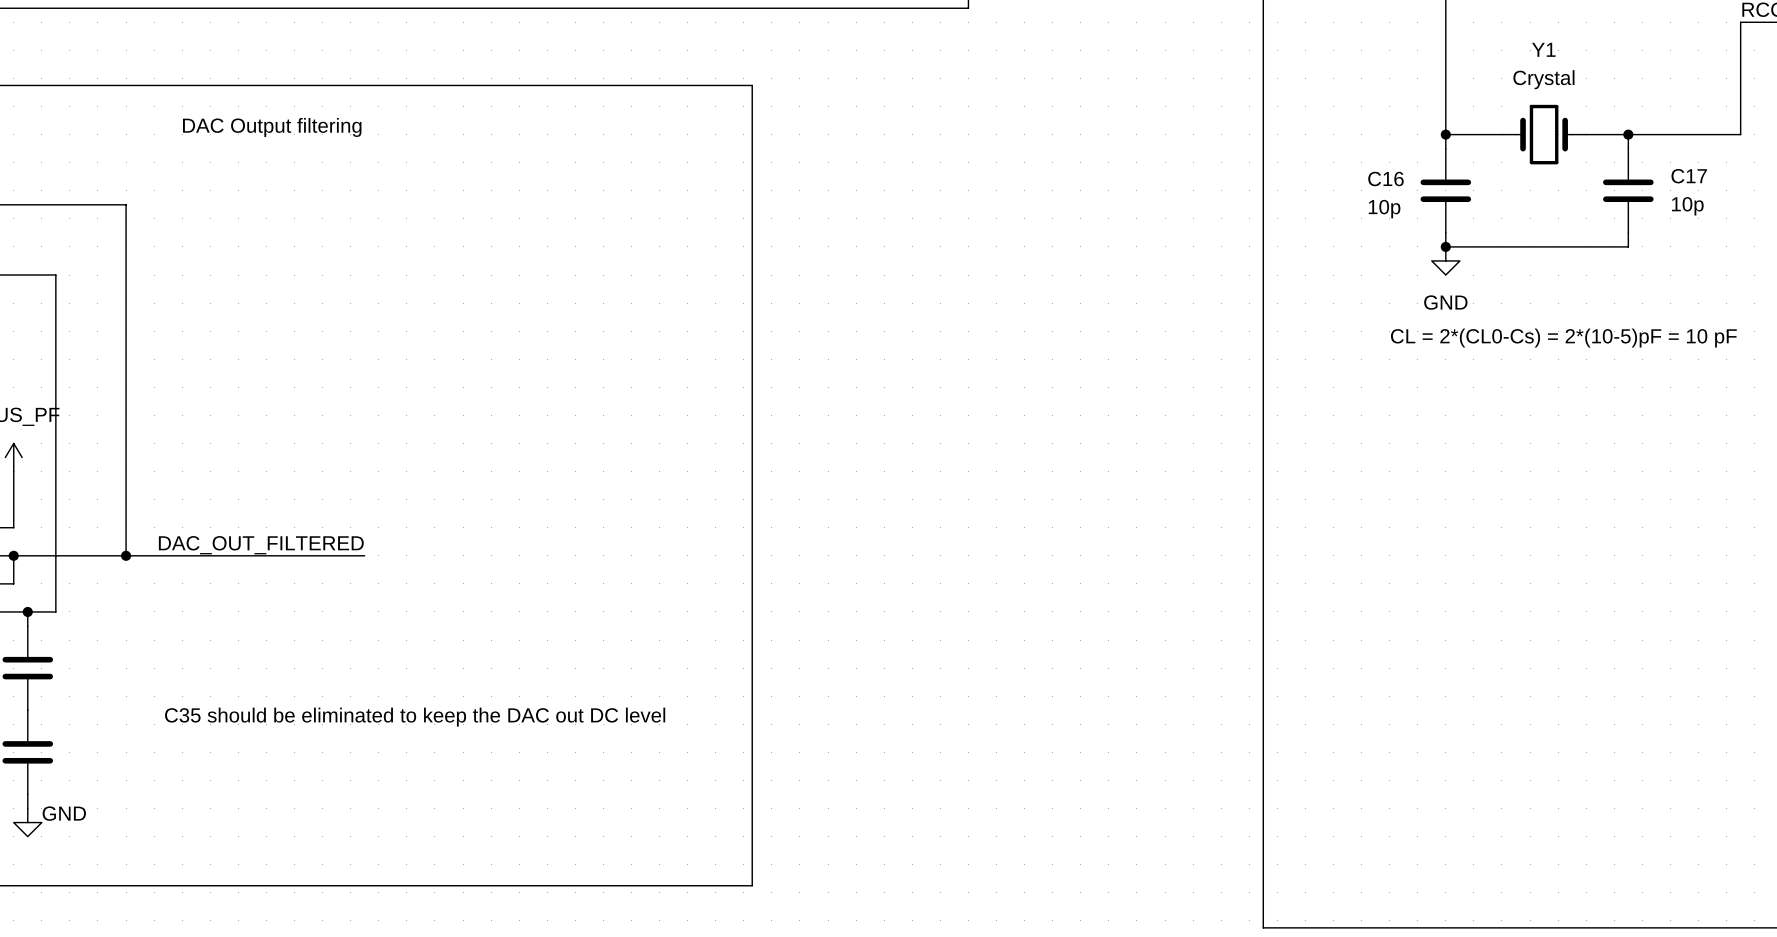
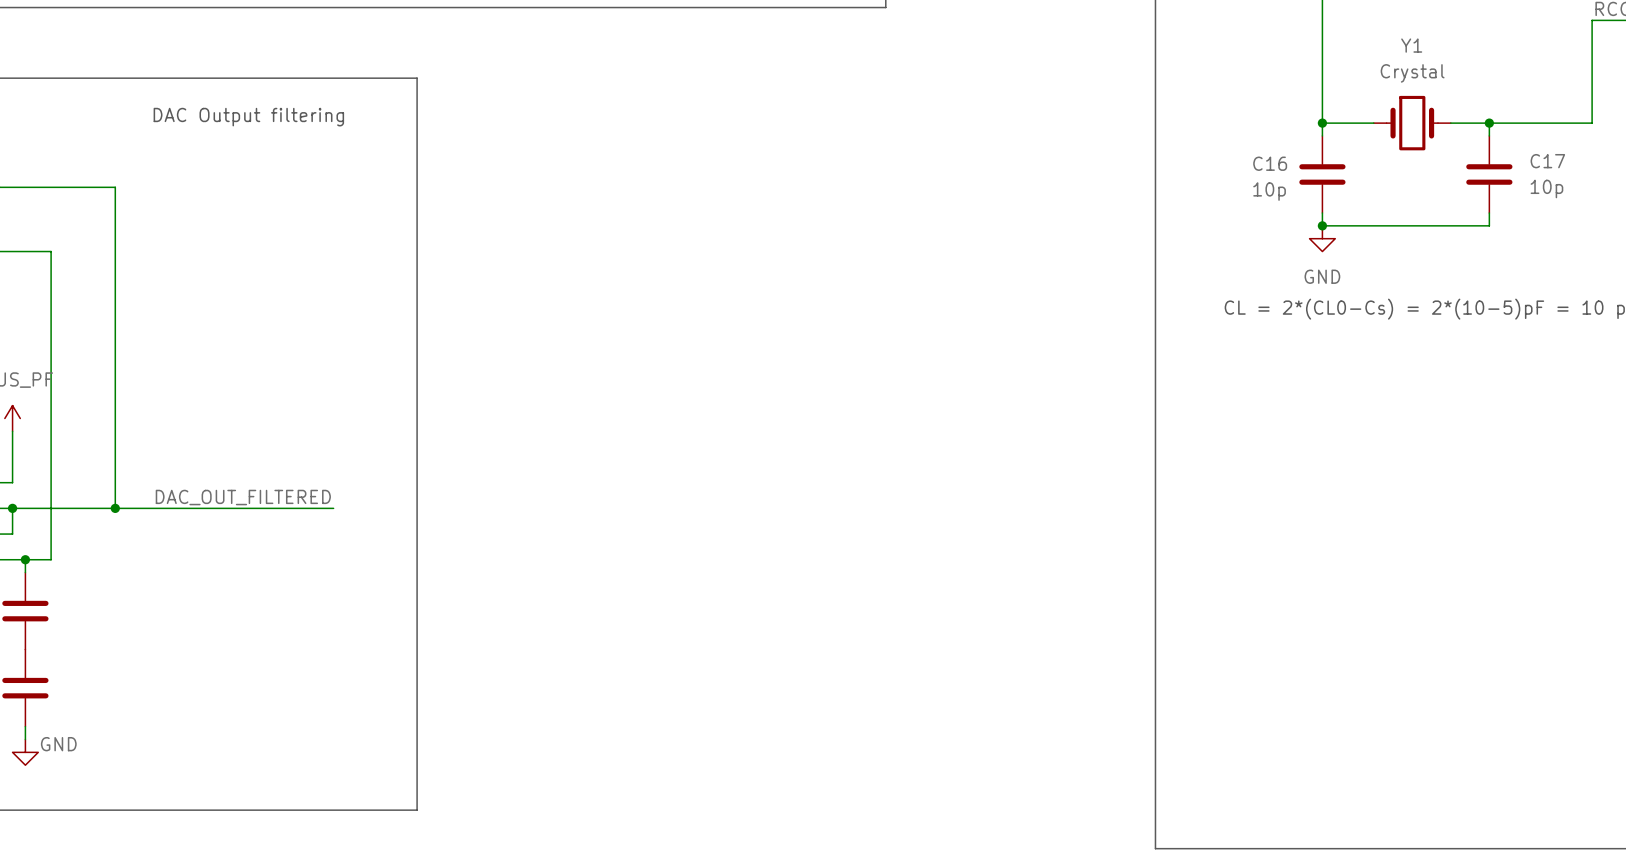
line: (455, 85) (752, 85) (752, 885) (455, 885) -> (417, 78) (417, 810)
text: C35 should be eliminated to keep the DAC out DC level (415, 717) -> none

